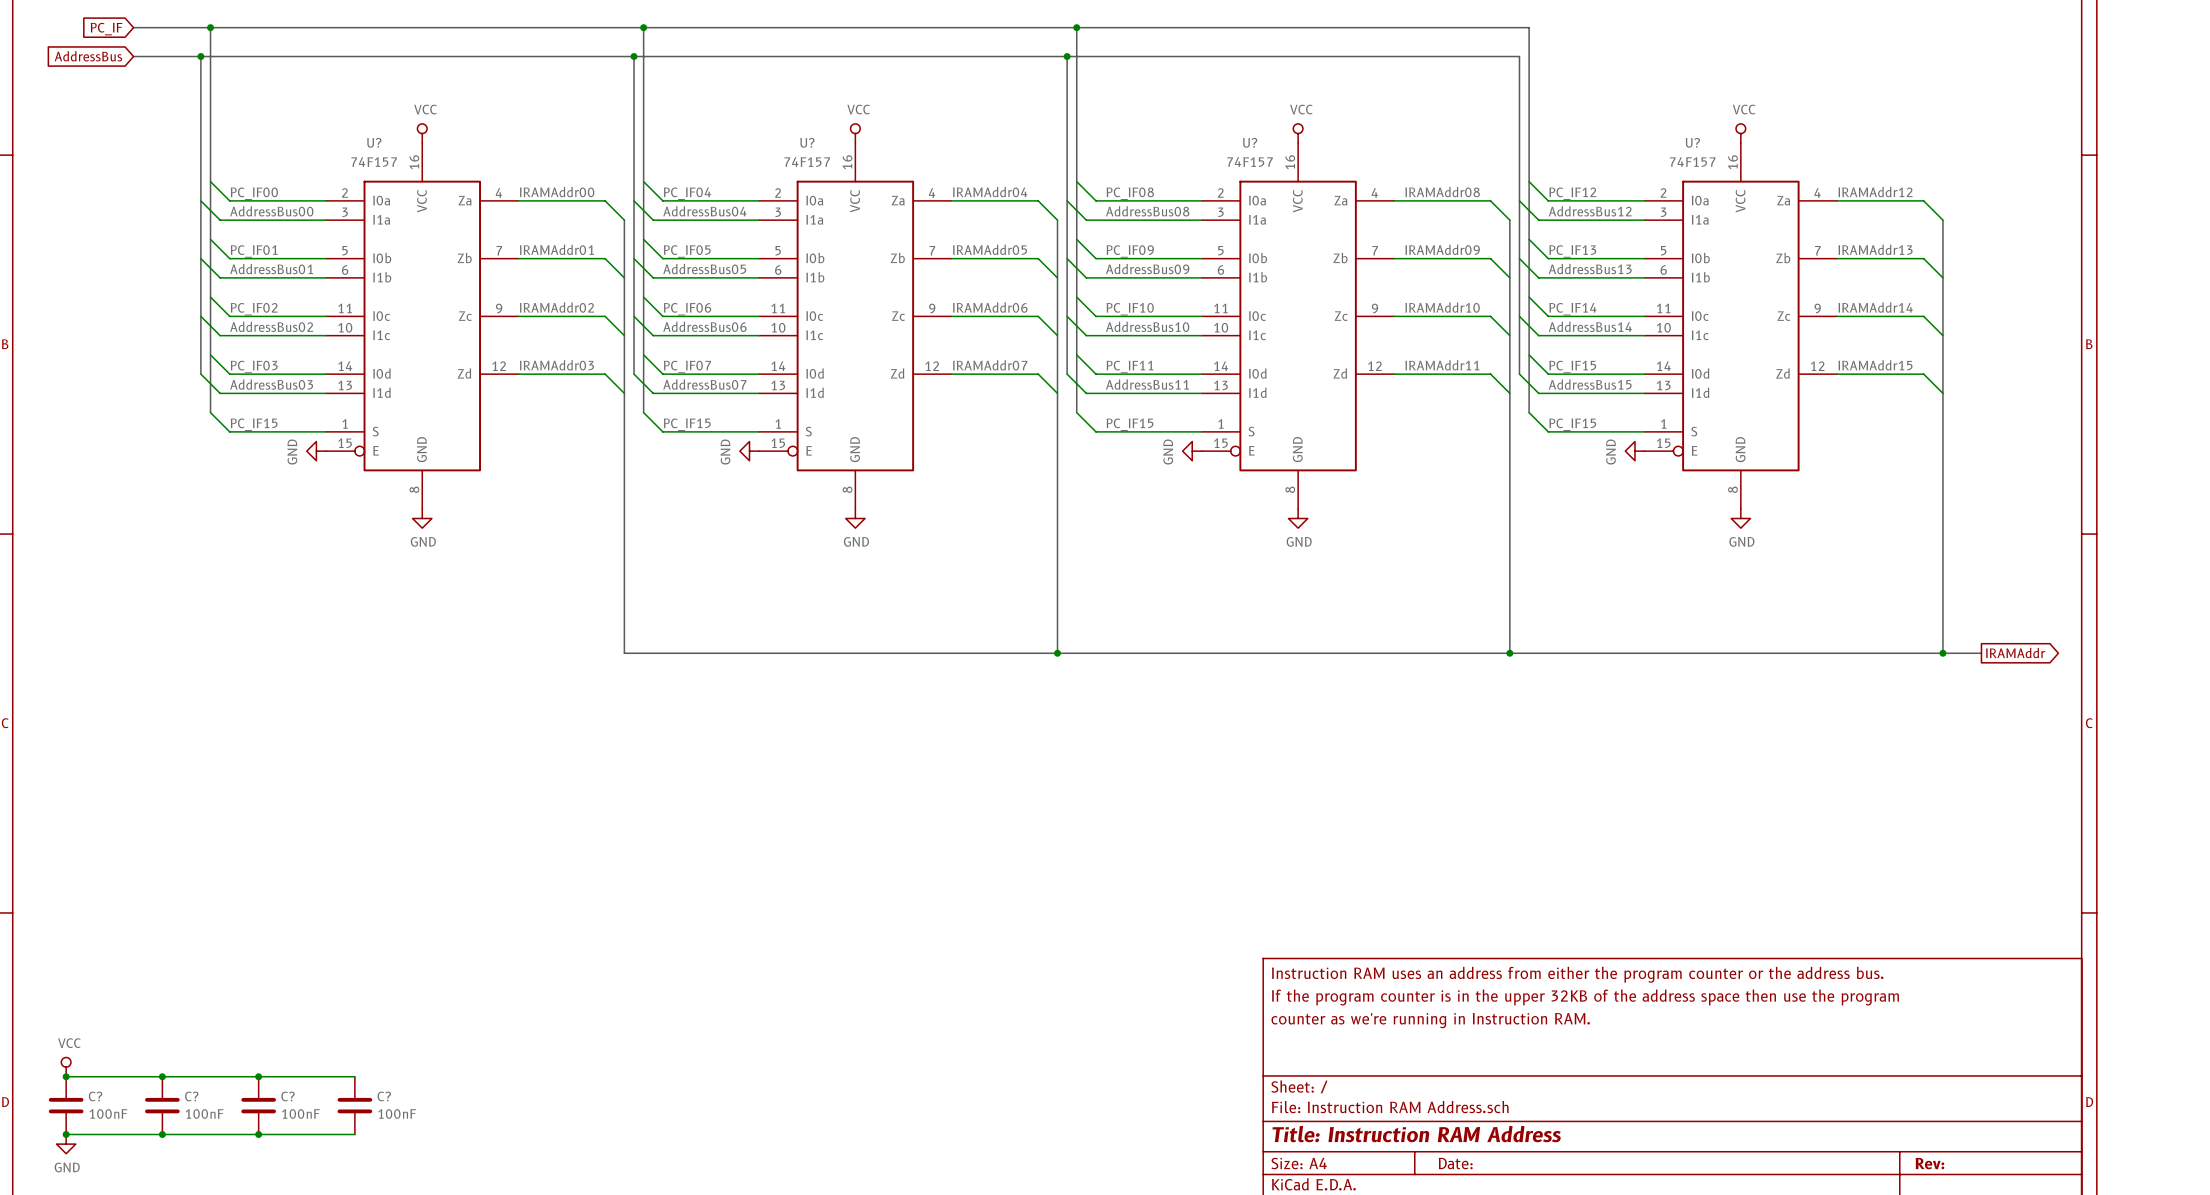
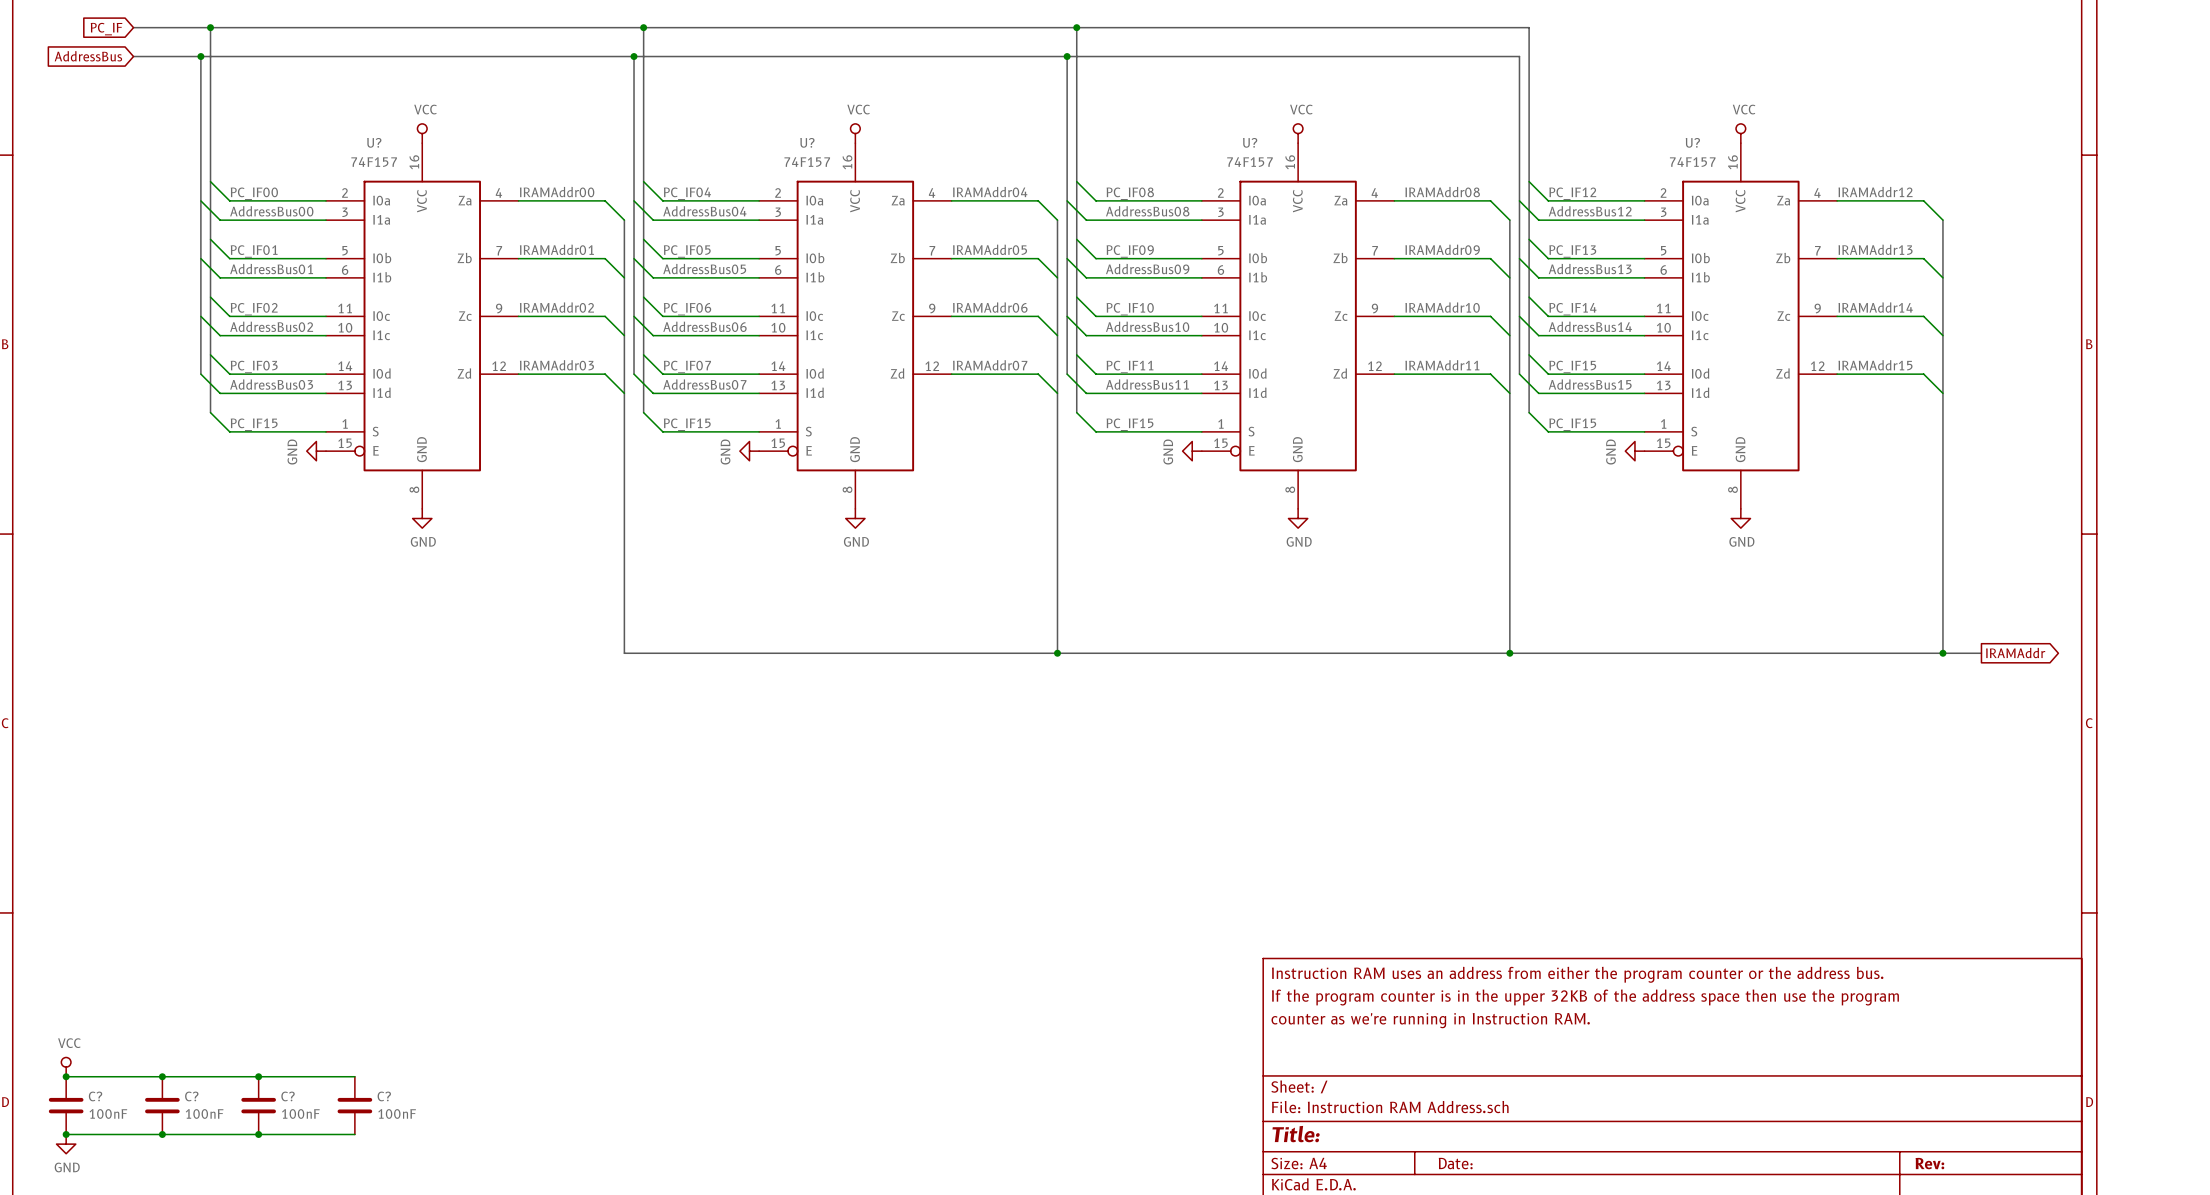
title block: Title: Instruction RAM Address (1416, 1134) -> Title: (1296, 1134)

